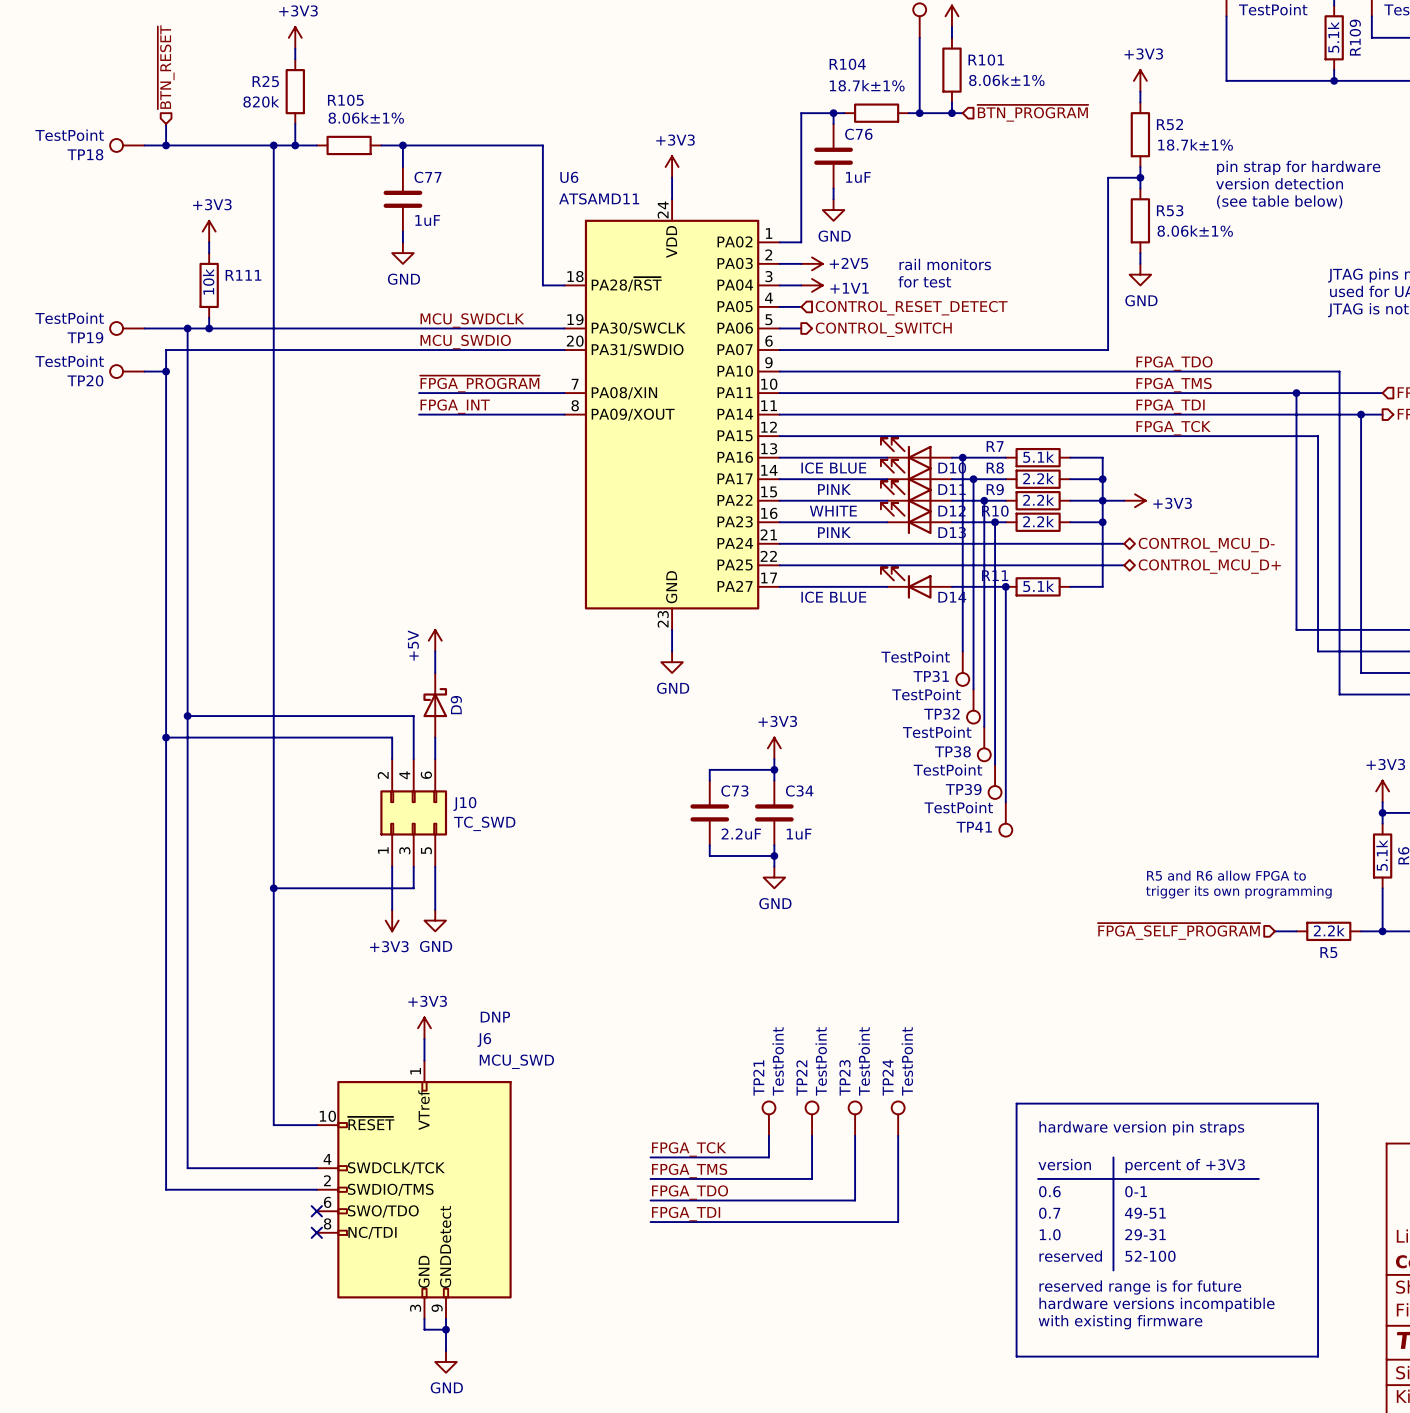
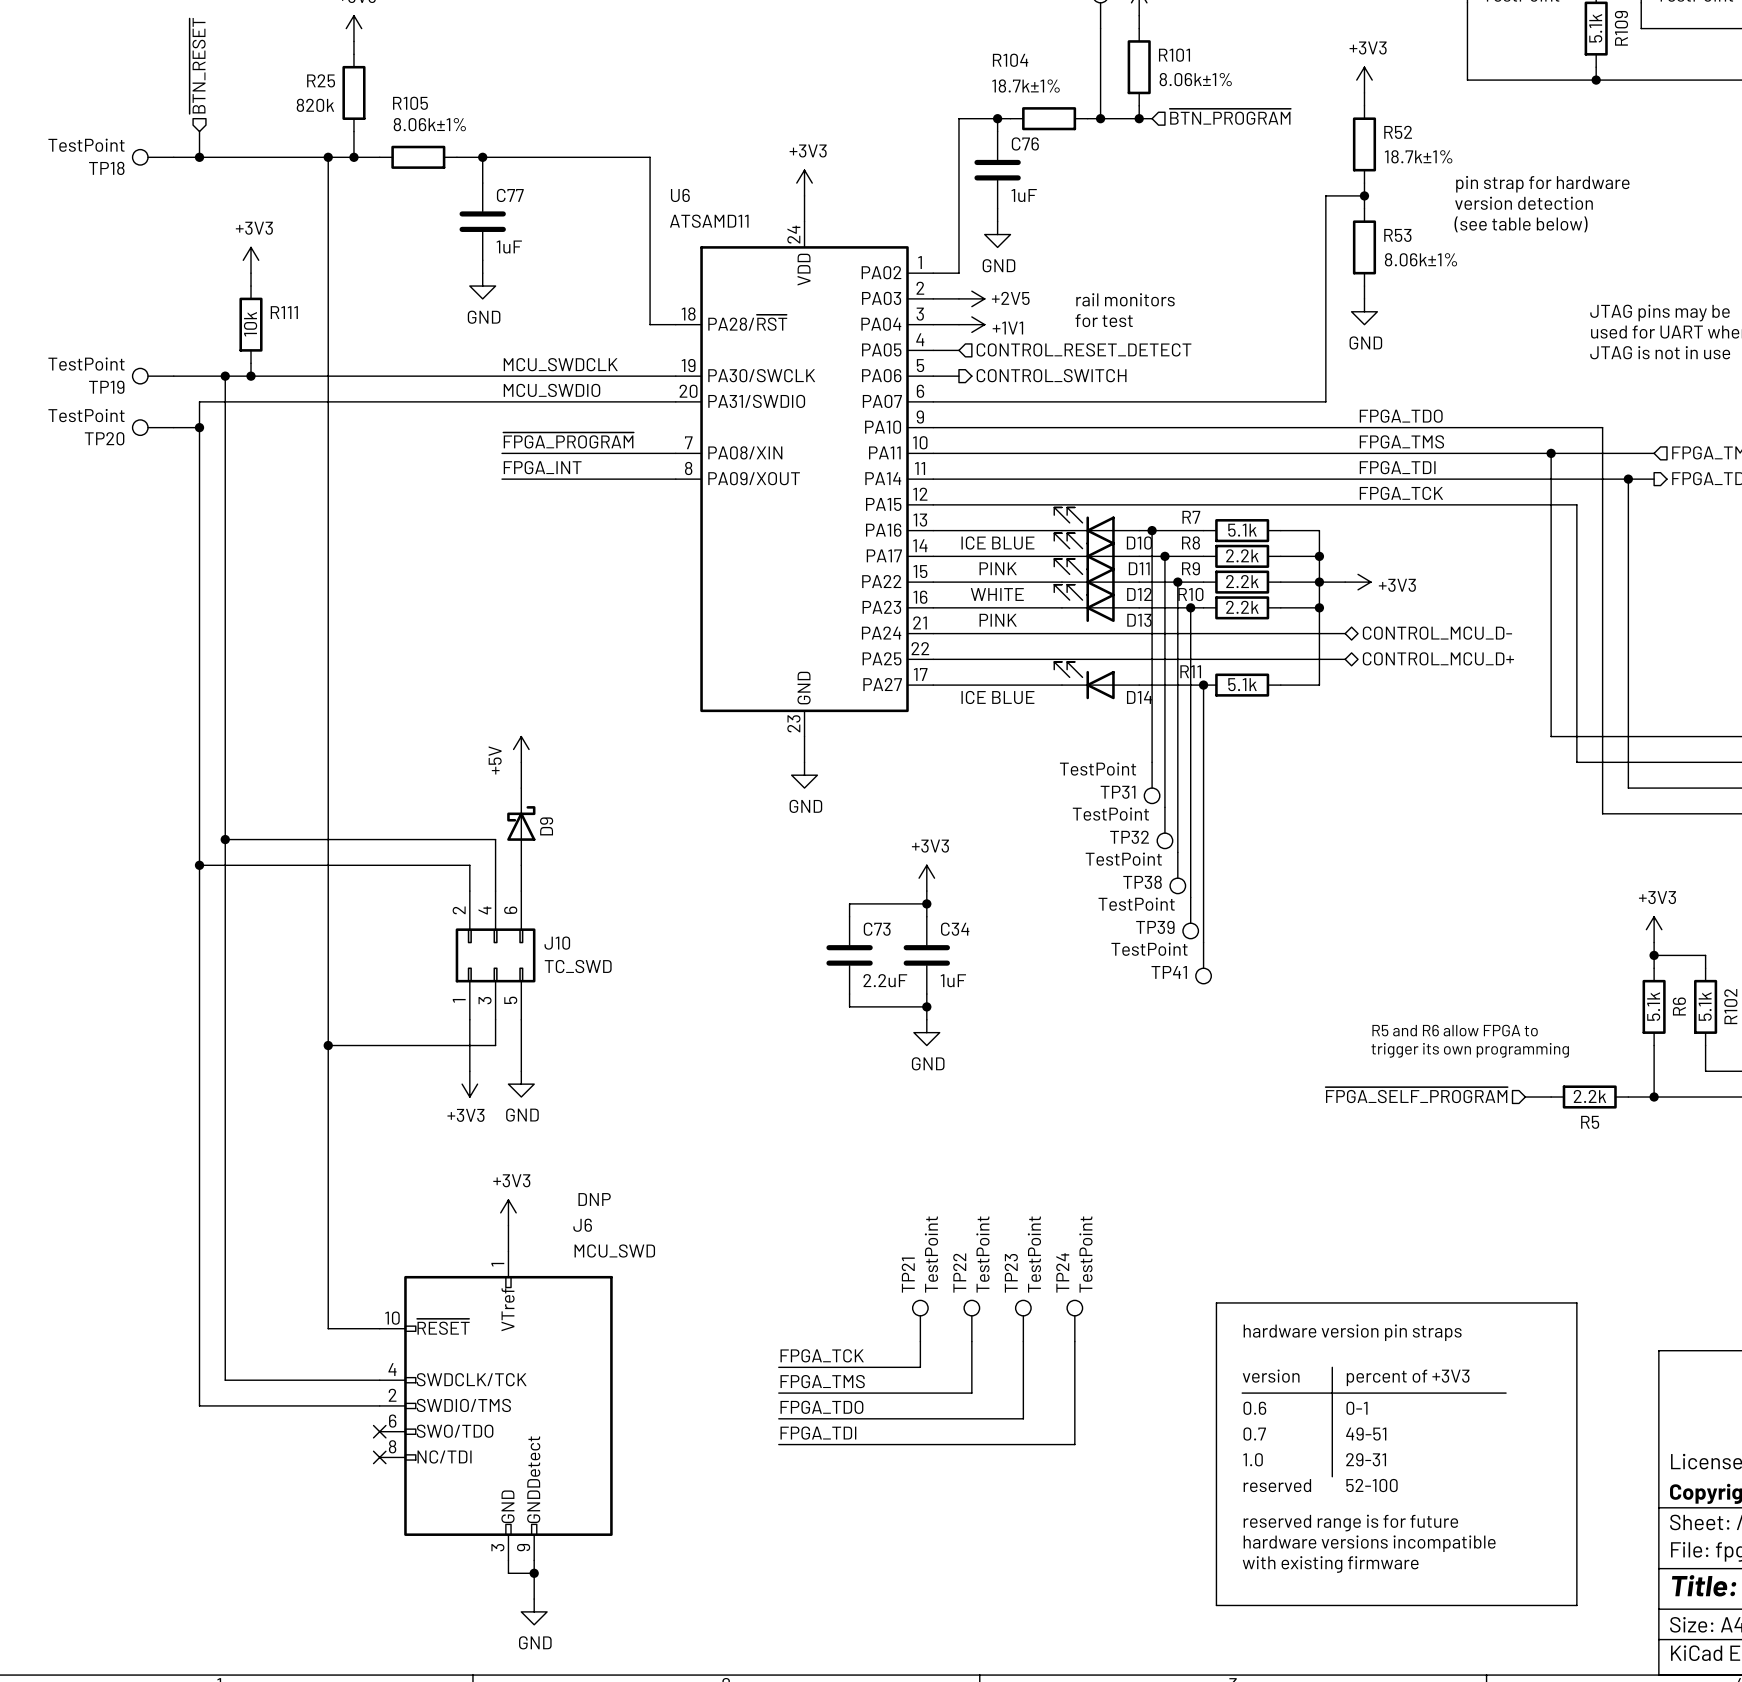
line: (1113, 1248) (1113, 1270) -> none

